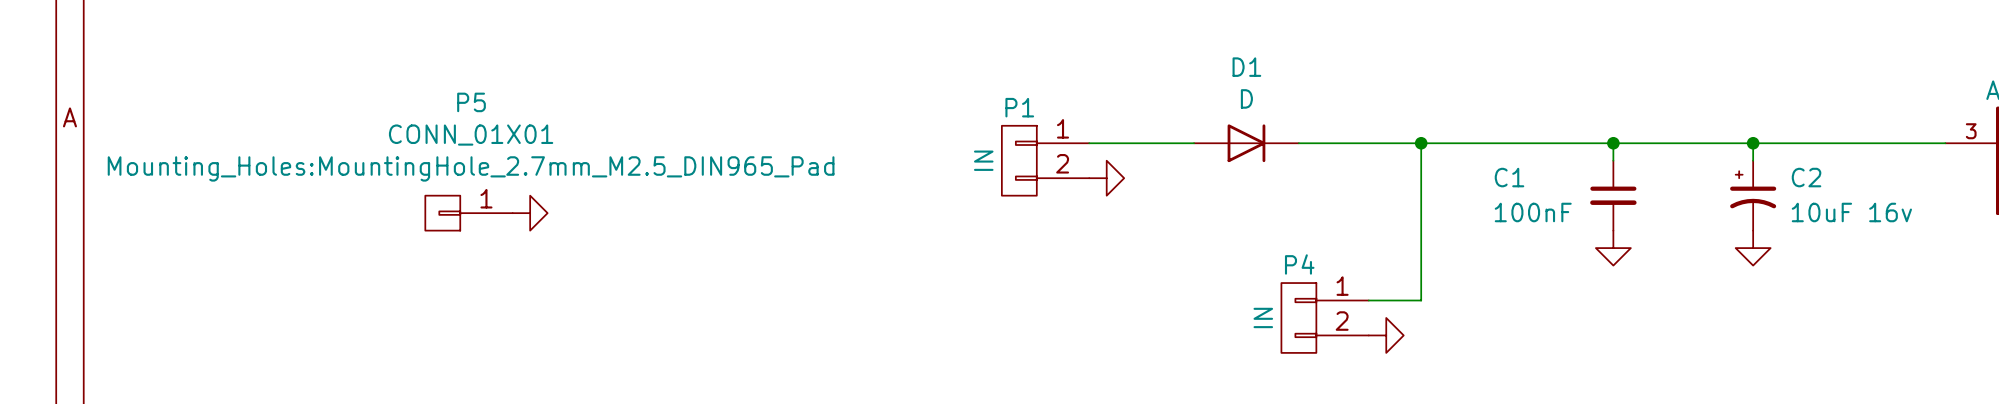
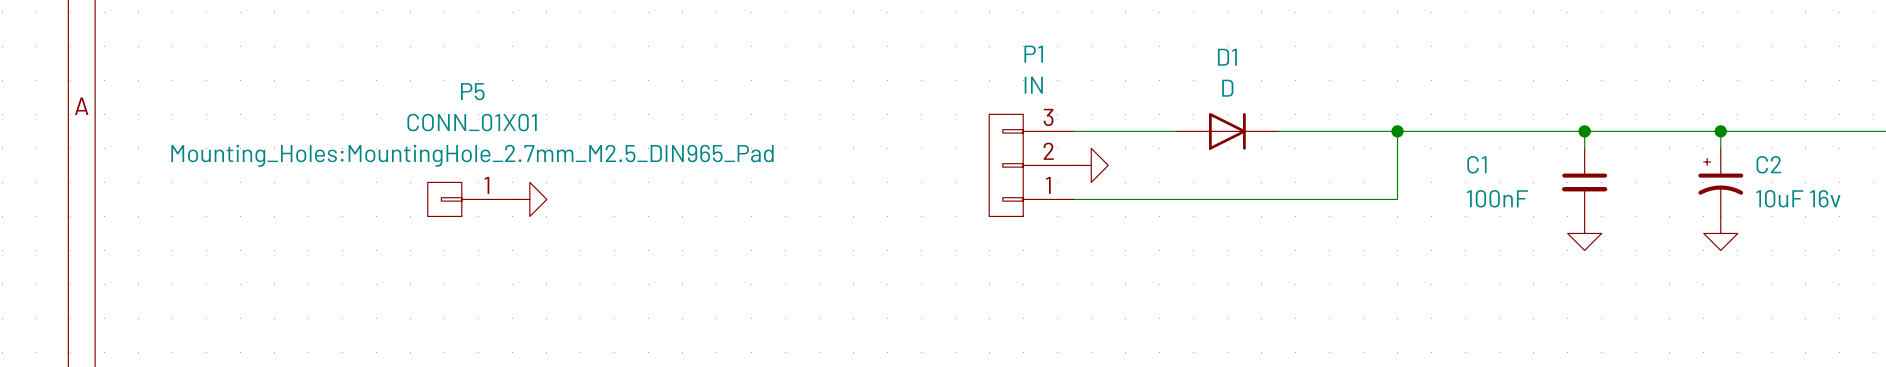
P1 name position: P1 (1019, 107) -> P1 (1033, 54)
P1 symbol: [1001, 125, 1090, 196] -> [989, 114, 1075, 217]
P1 value position: IN (983, 160) -> IN (1033, 85)
wire: (1421, 213) (1421, 300) (1368, 300) -> (1397, 199) (1074, 199)
P4: IN (1325, 317) -> none
power symbol: (1386, 335) -> none

